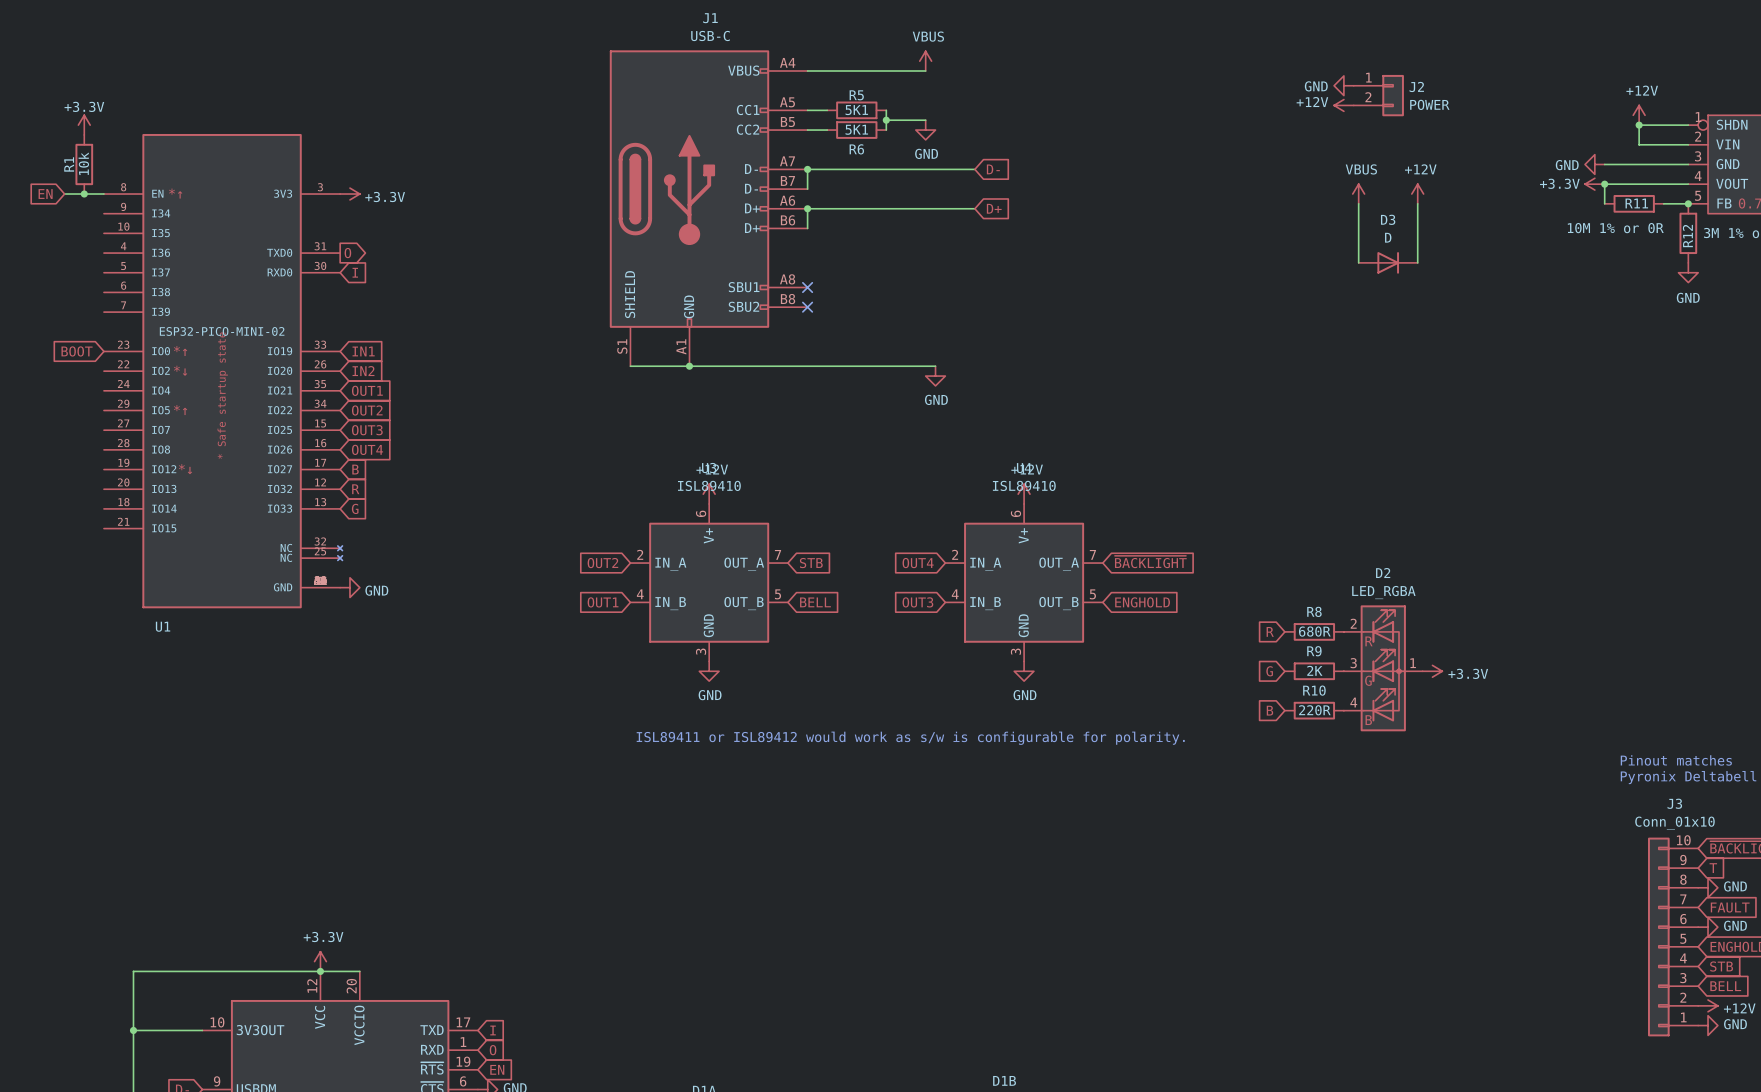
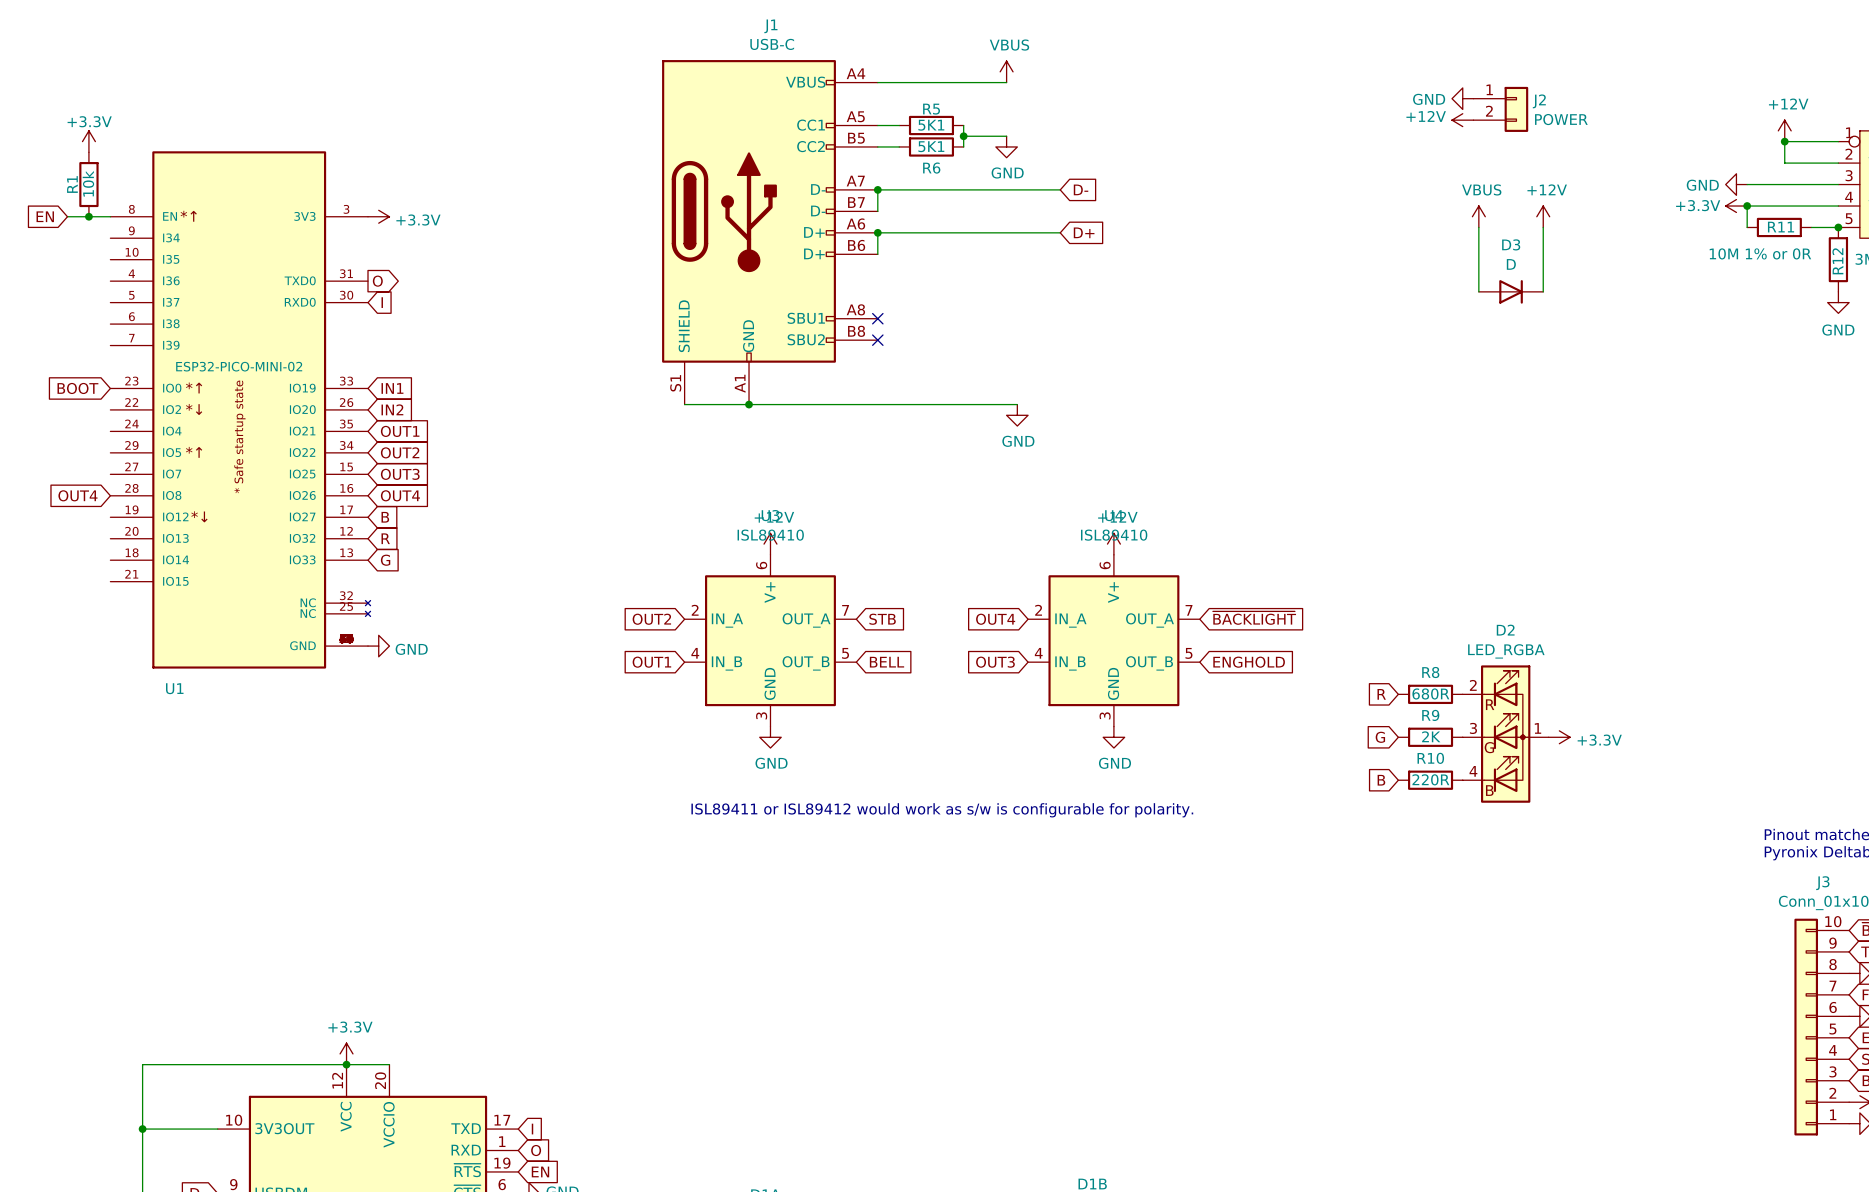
global label: none -> OUT4 (77, 495)

